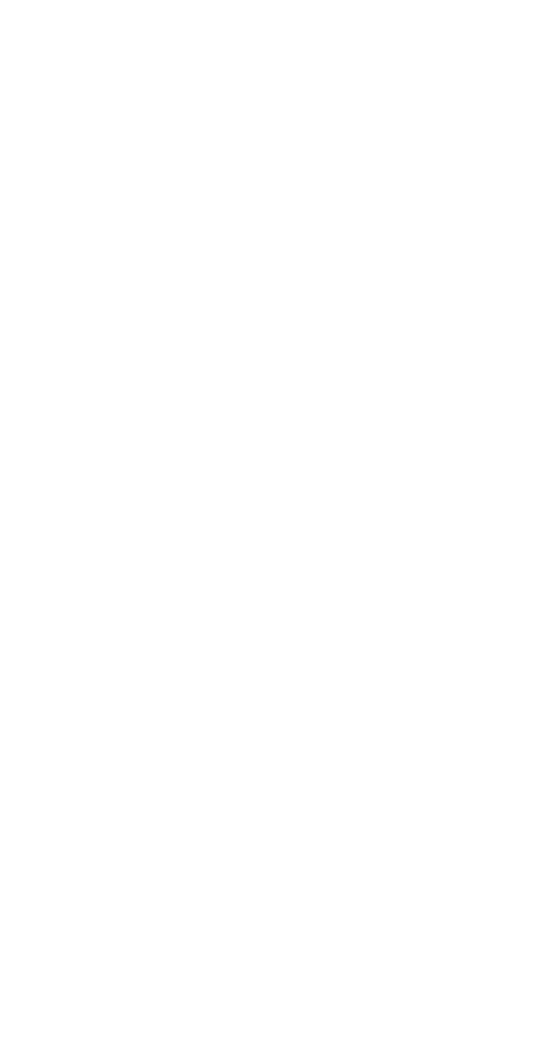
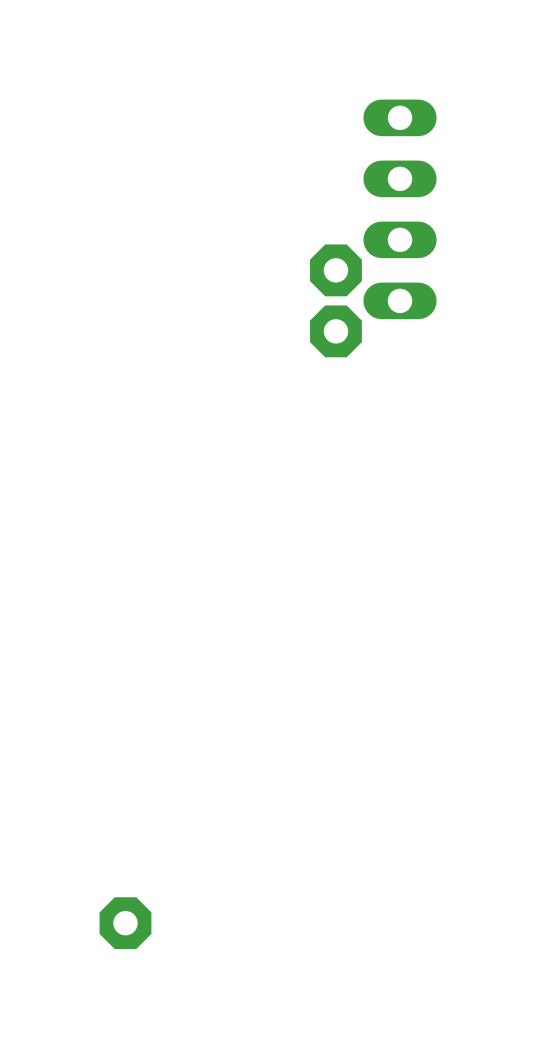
part: none -> (400, 209)
part: none -> (335, 270)
part: none -> (335, 331)
part: none -> (125, 923)

